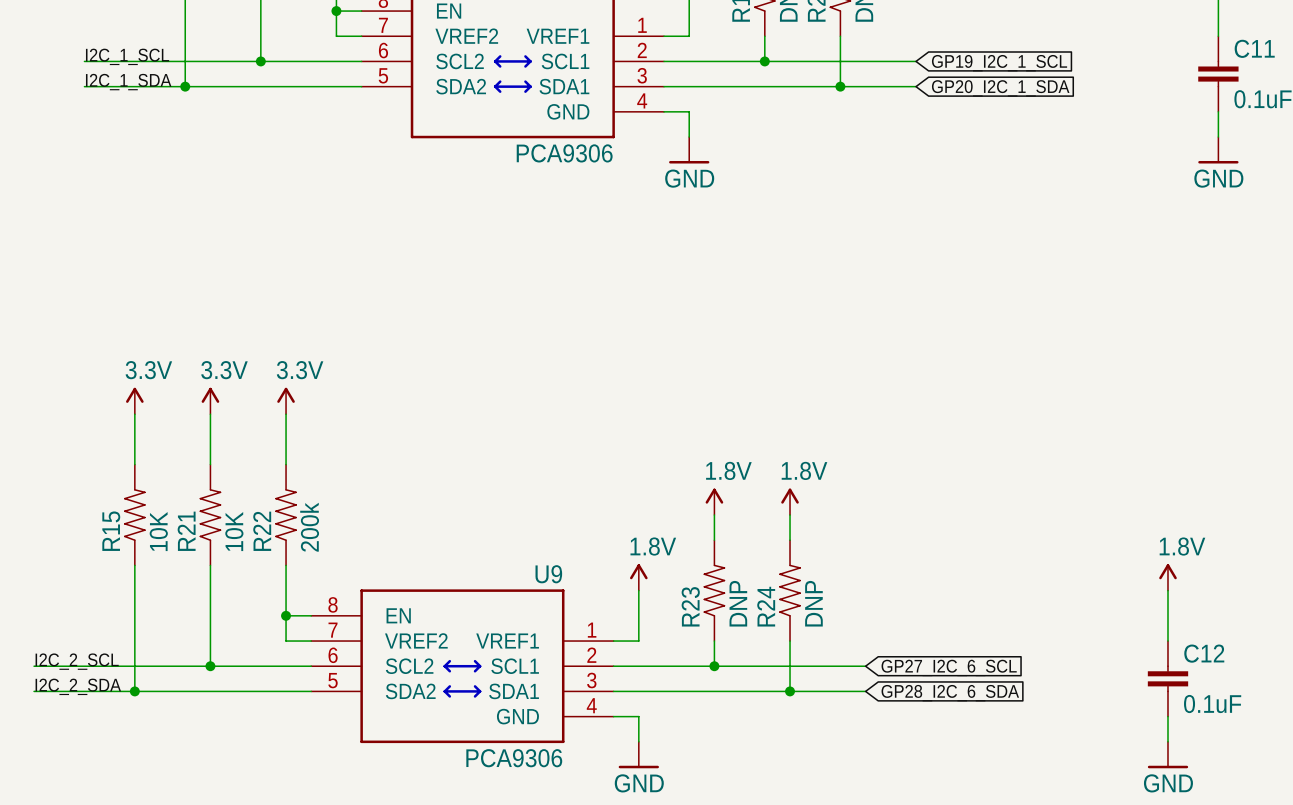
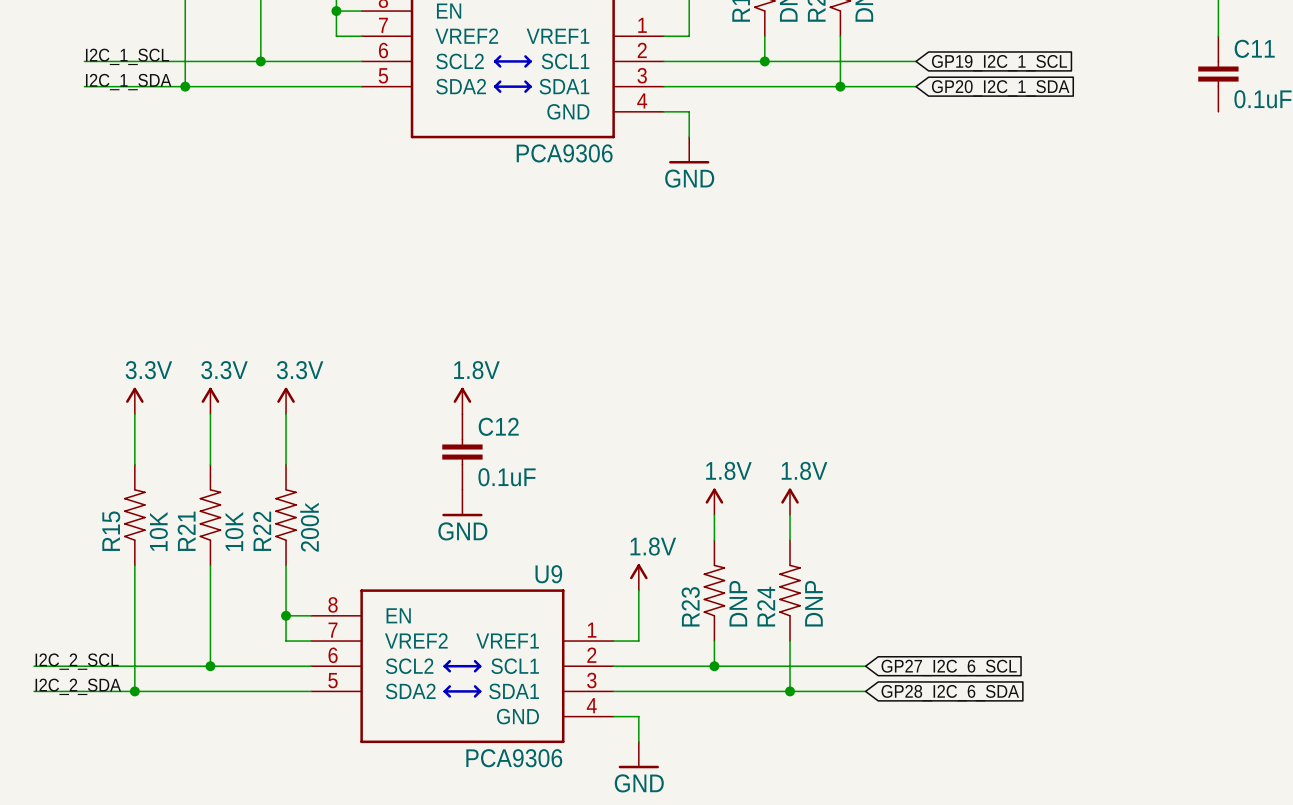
wire: (1218, 111) (1218, 137) -> none
power symbol: GND (1218, 150) -> none
power symbol: none -> 1.8V (462, 401)
power symbol: none -> GND (462, 503)
power symbol: 1.8V (1167, 577) -> none
wire: (1167, 590) (1167, 641) -> none
C12 position: (1167, 678) -> (462, 452)
wire: (1167, 716) (1167, 741) -> none
power symbol: GND (1167, 755) -> none

